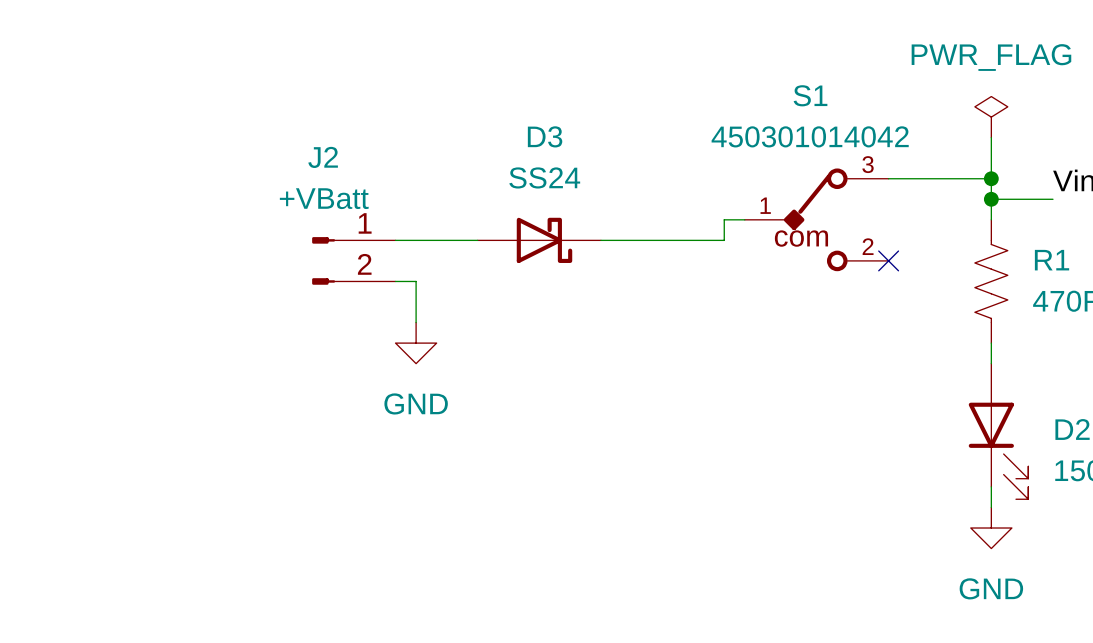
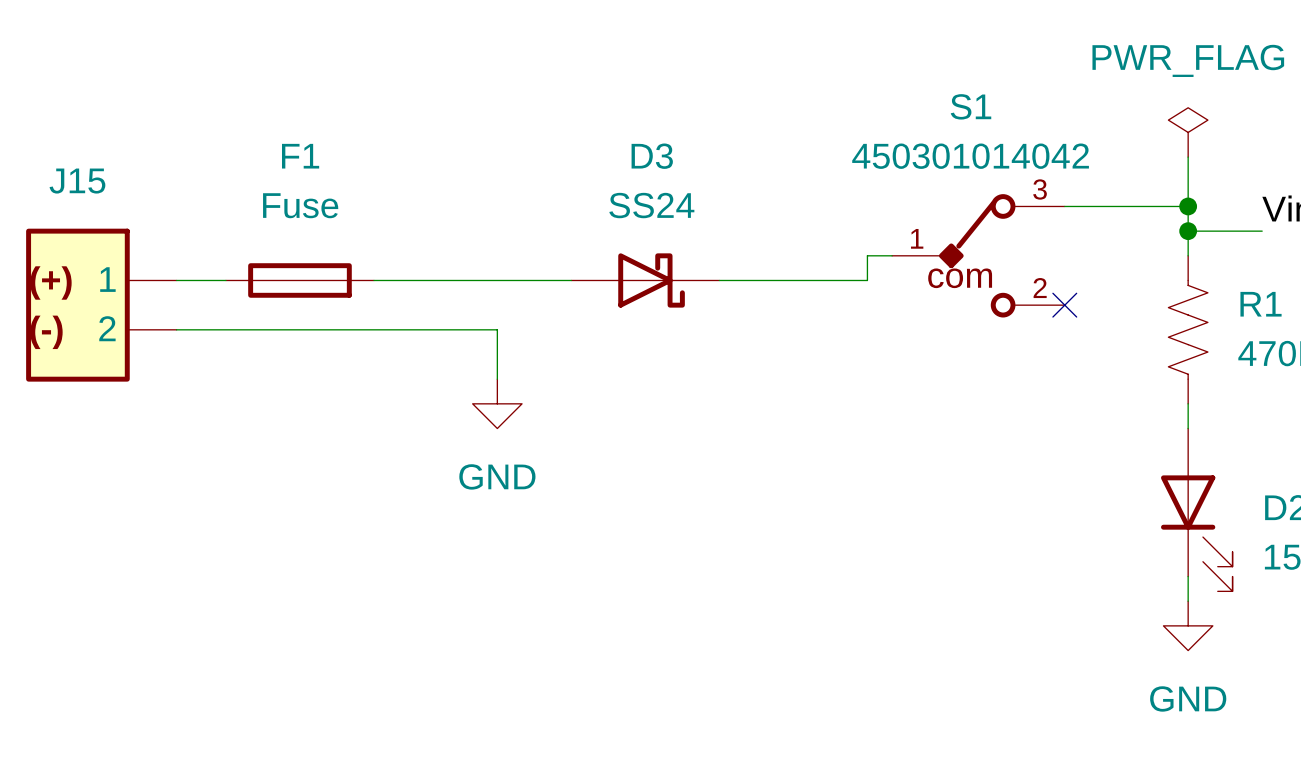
wire: none -> (176, 280) (225, 280)
F1: none -> Fuse (299, 280)
J15: none -> (101, 305)
J2: +VBatt (353, 260) -> none
wire: none -> (176, 329) (472, 329)

